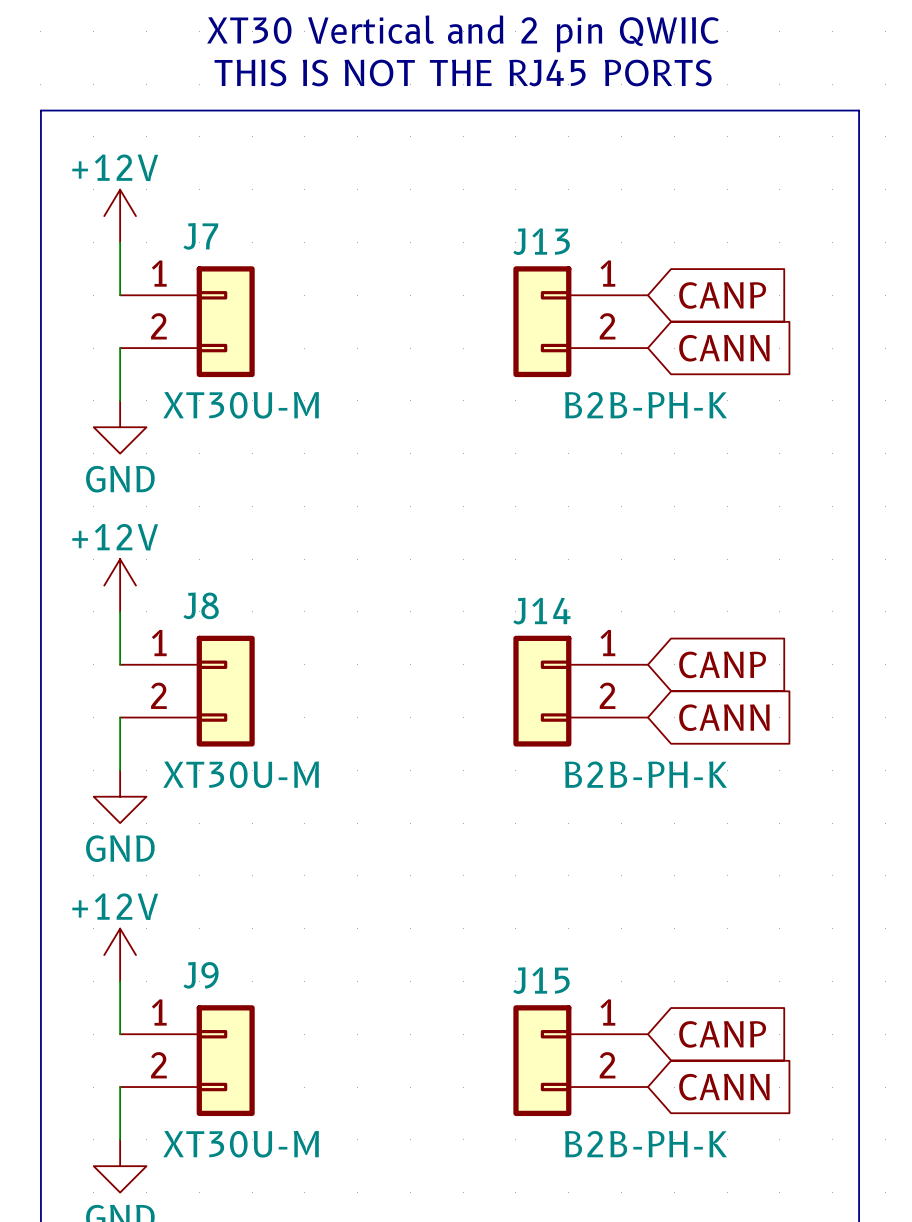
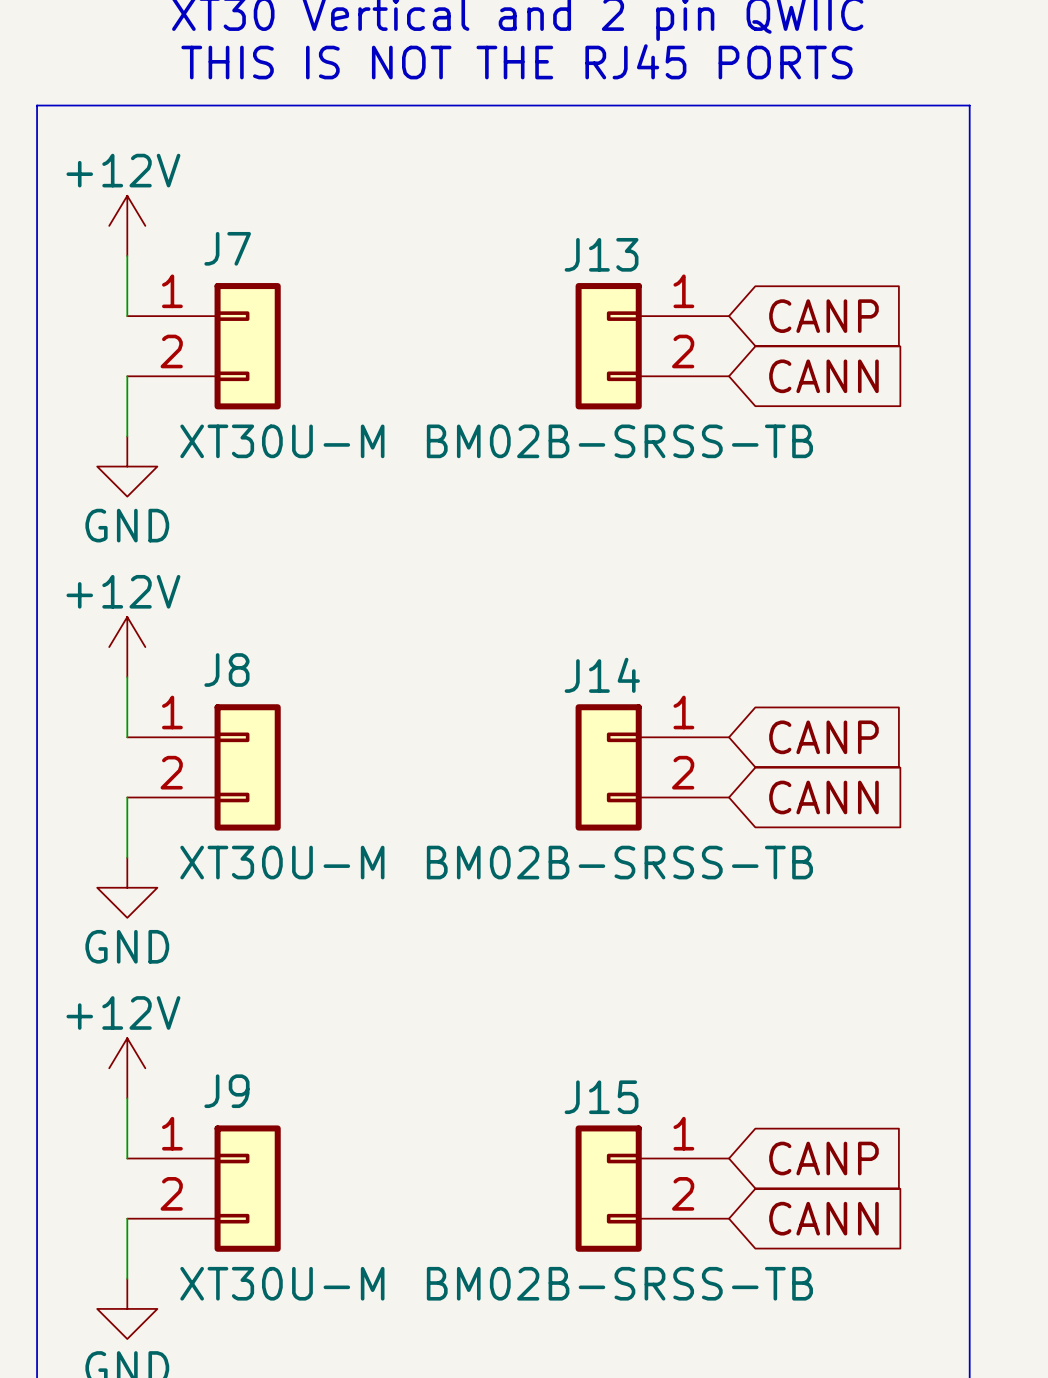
J13 value: B2B-PH-K (645, 405) -> BM02B-SRSS-TB (619, 441)
J14 value: B2B-PH-K (645, 774) -> BM02B-SRSS-TB (619, 862)
J15 value: B2B-PH-K (645, 1144) -> BM02B-SRSS-TB (619, 1283)

